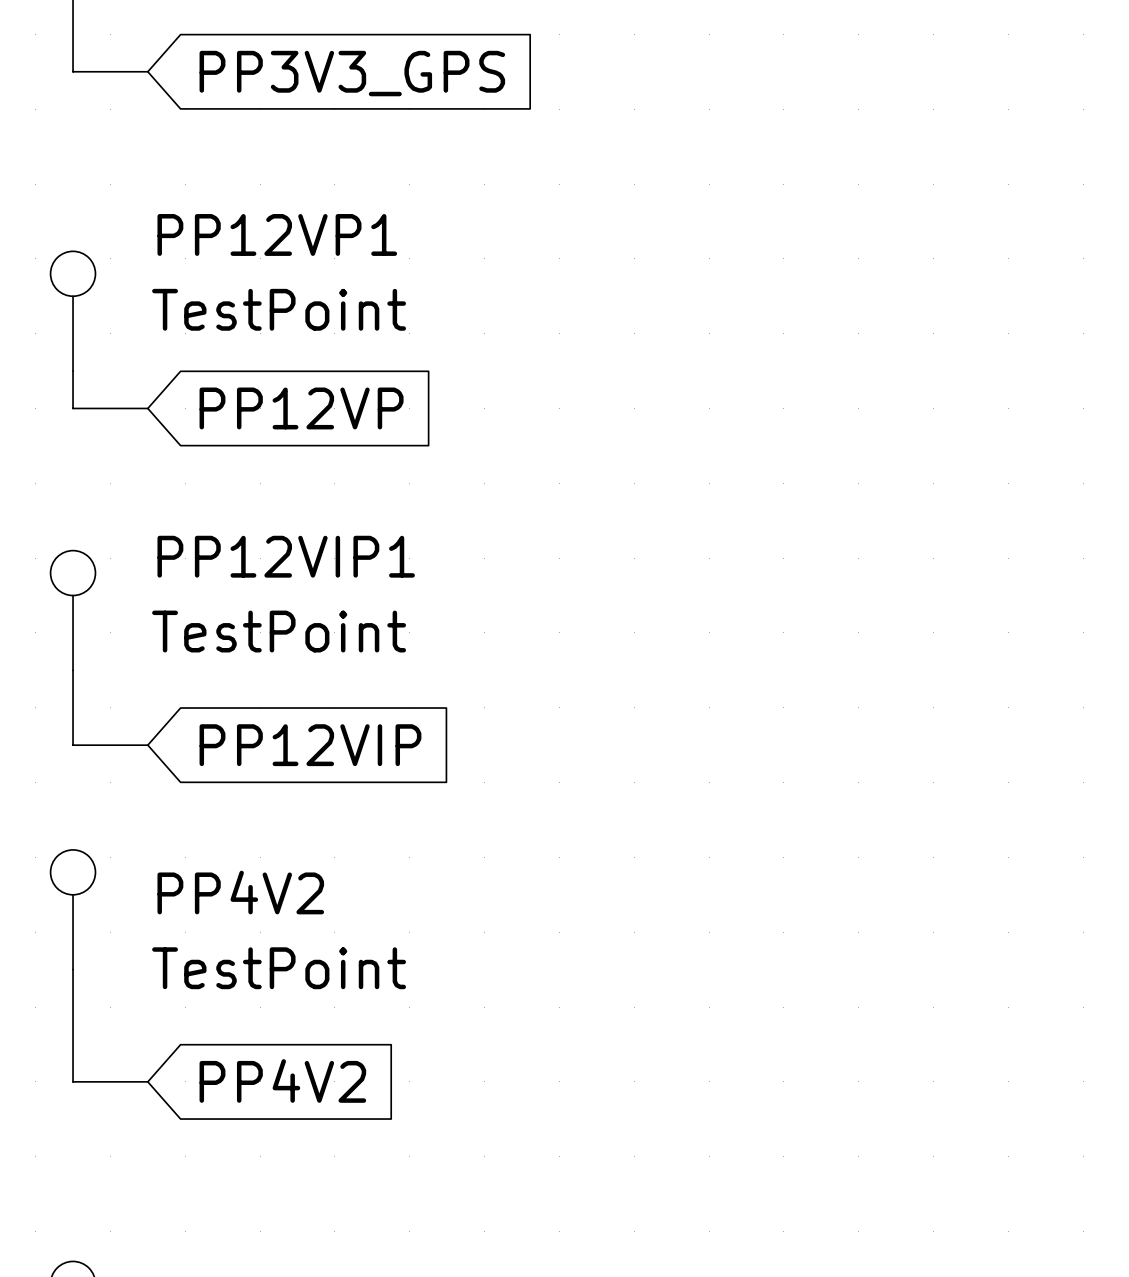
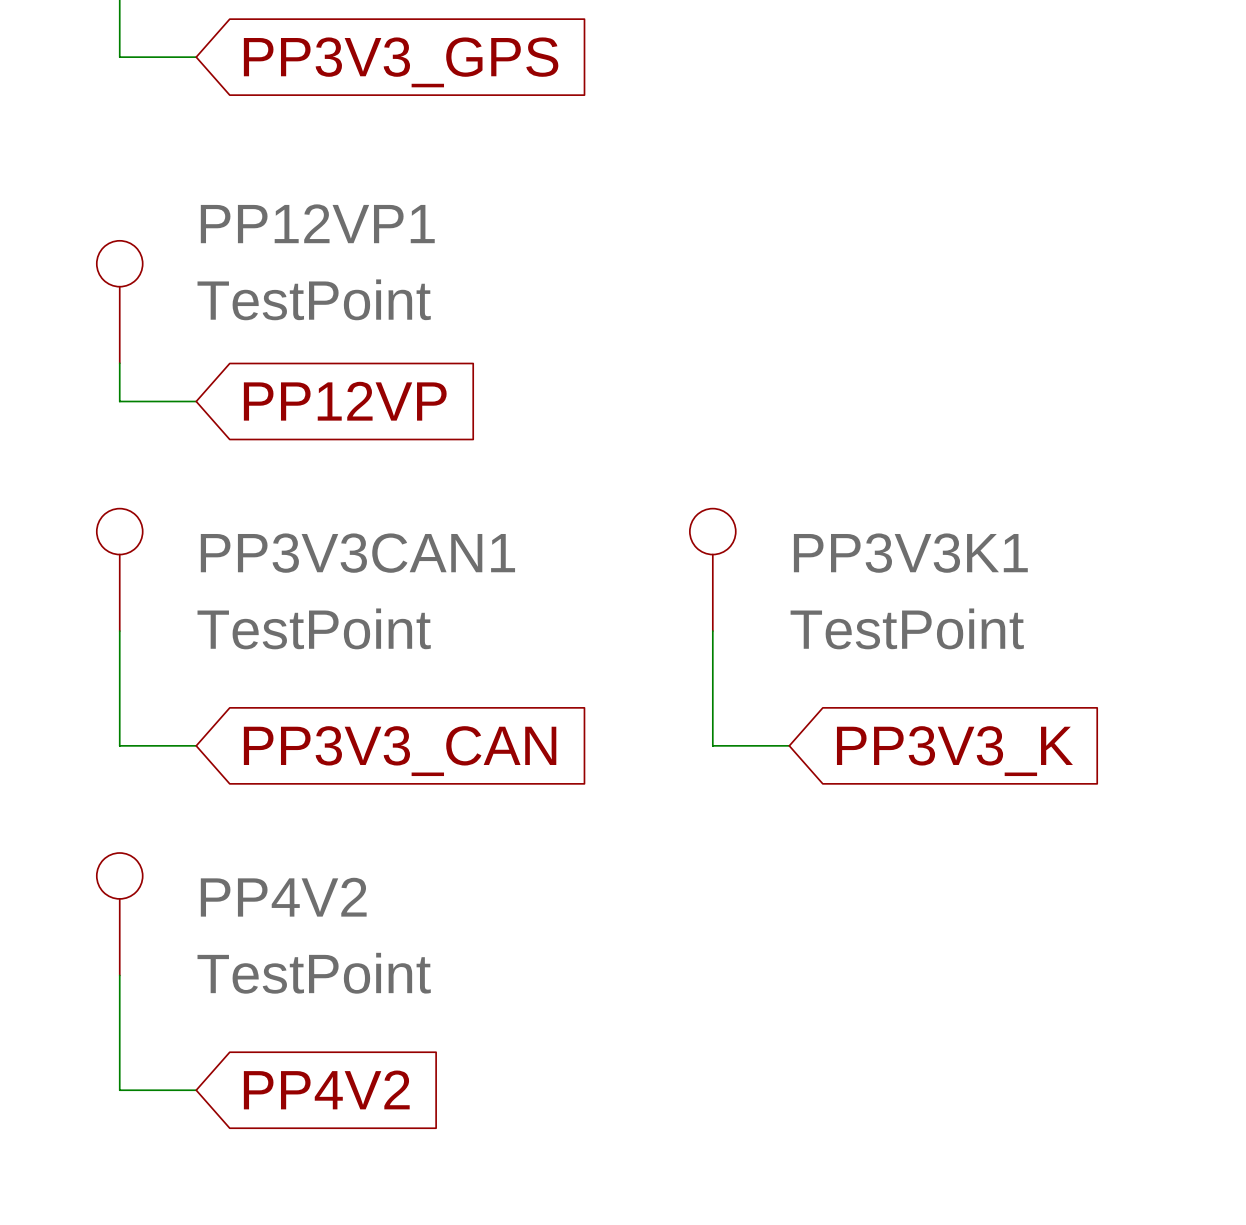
PP3V3CAN1: none -> TestPoint (119, 569)
PP3V3K1: none -> TestPoint (712, 569)
PP12VIP1: TestPoint (73, 610) -> none
wire: none -> (712, 631) (712, 745) (789, 745)
global label: PP12VIP (310, 745) -> PP3V3_CAN (400, 751)
global label: none -> PP3V3_K (954, 751)

